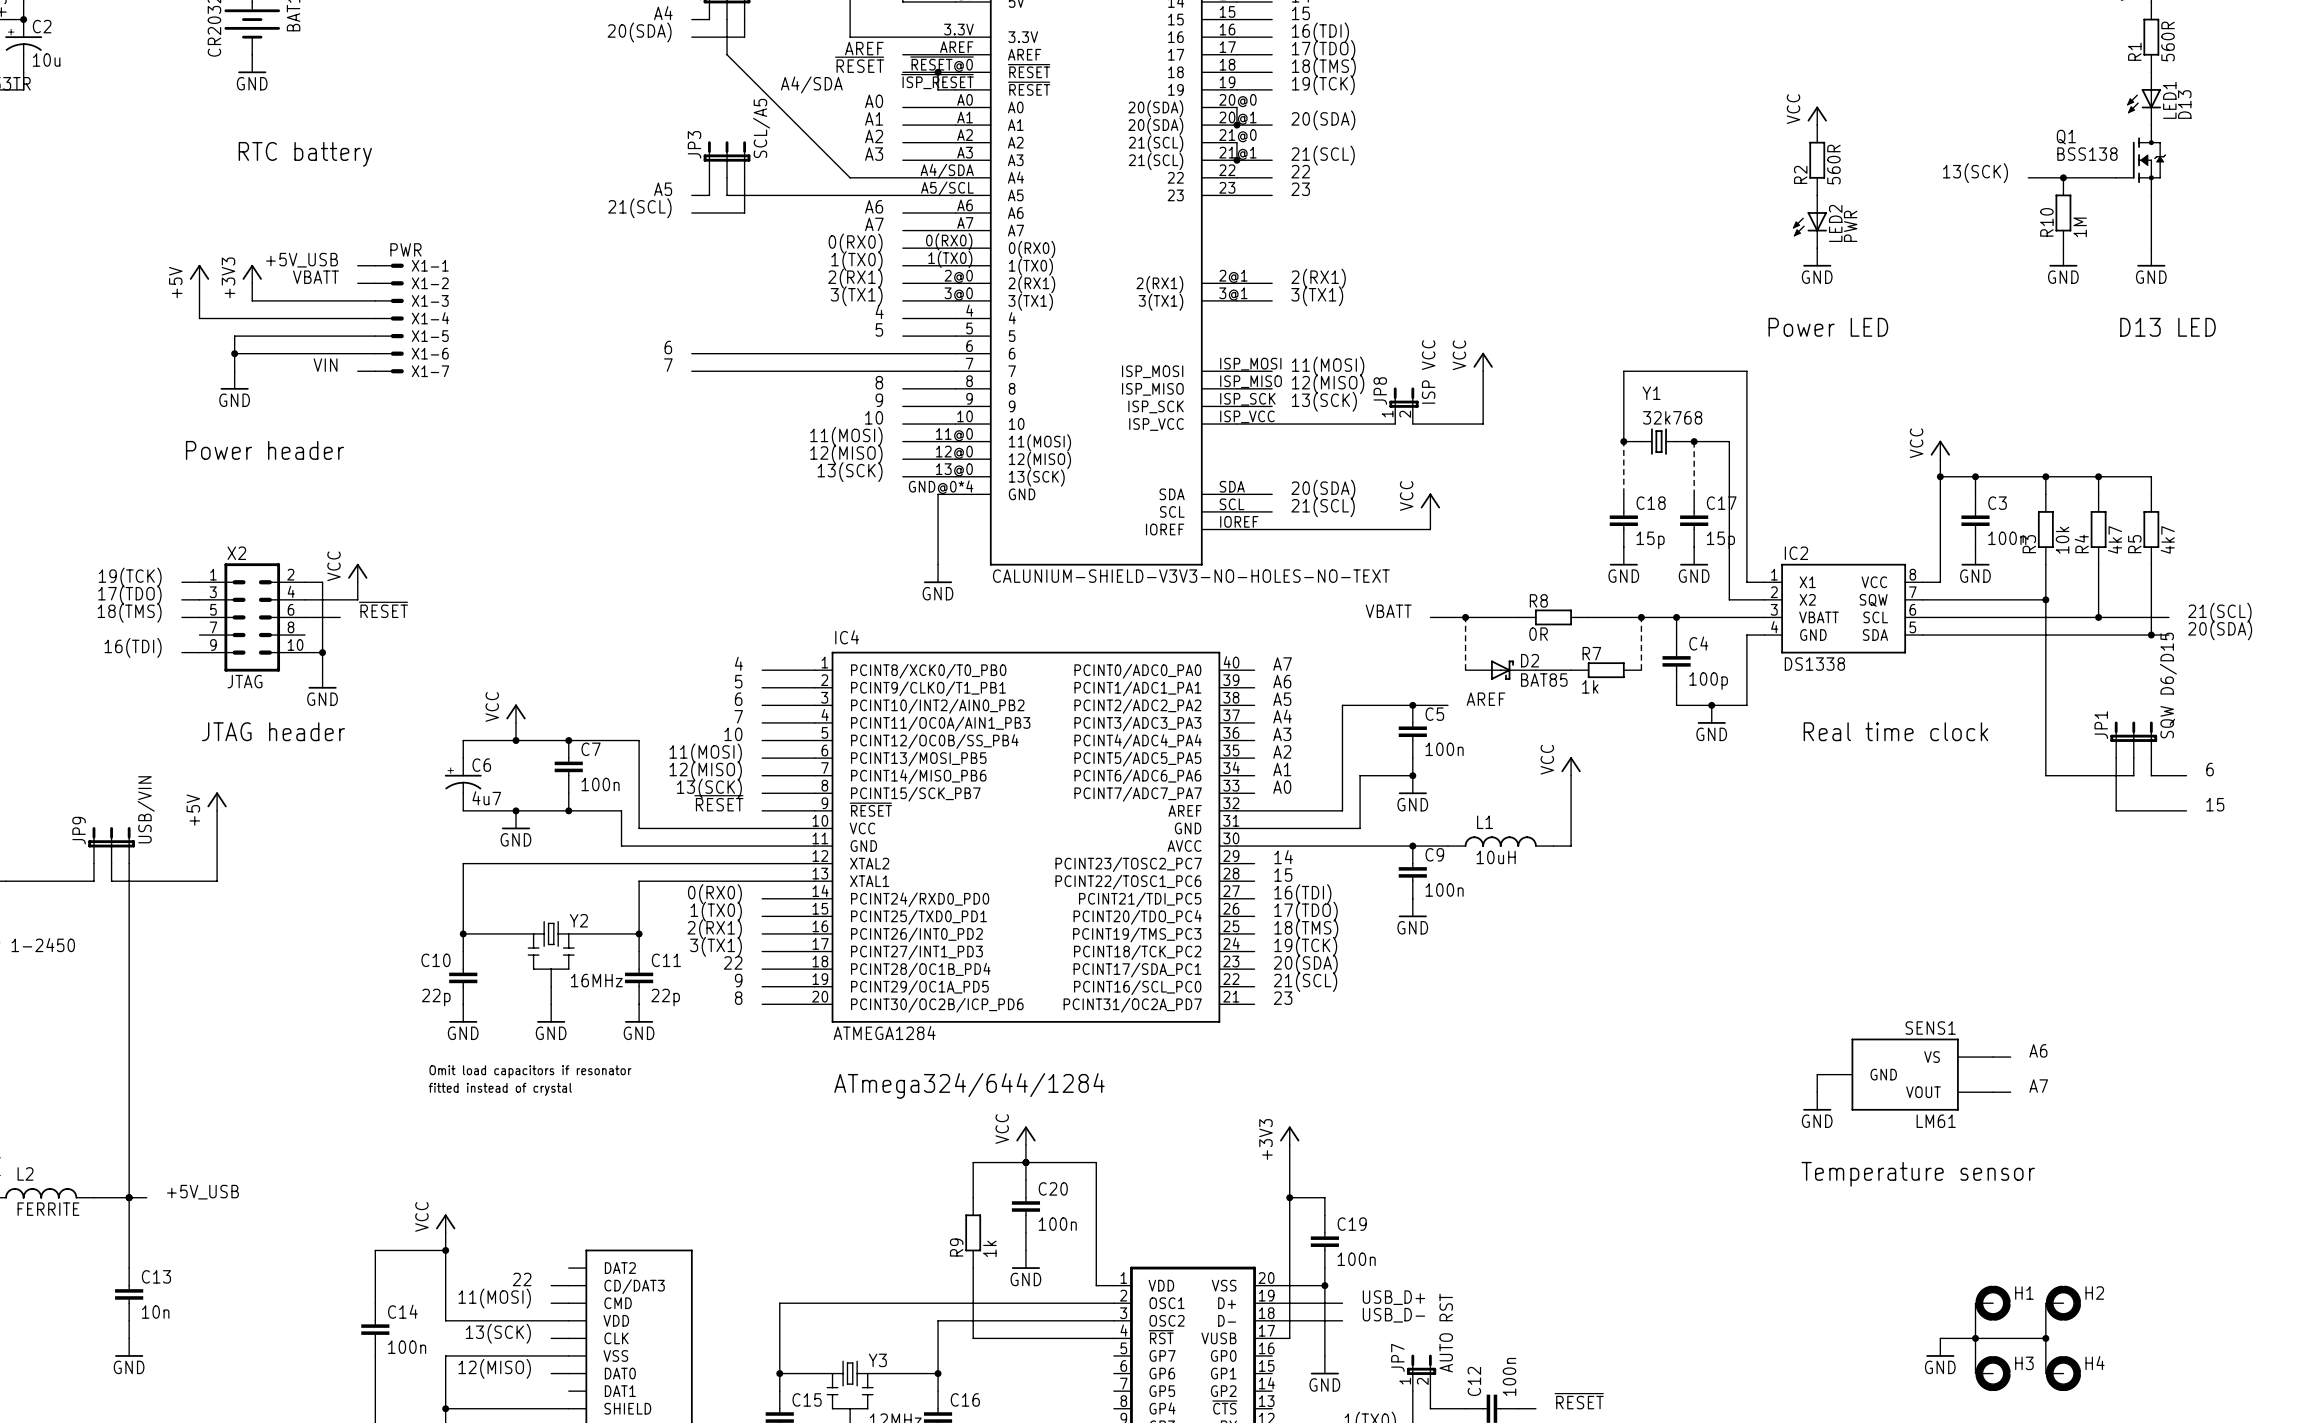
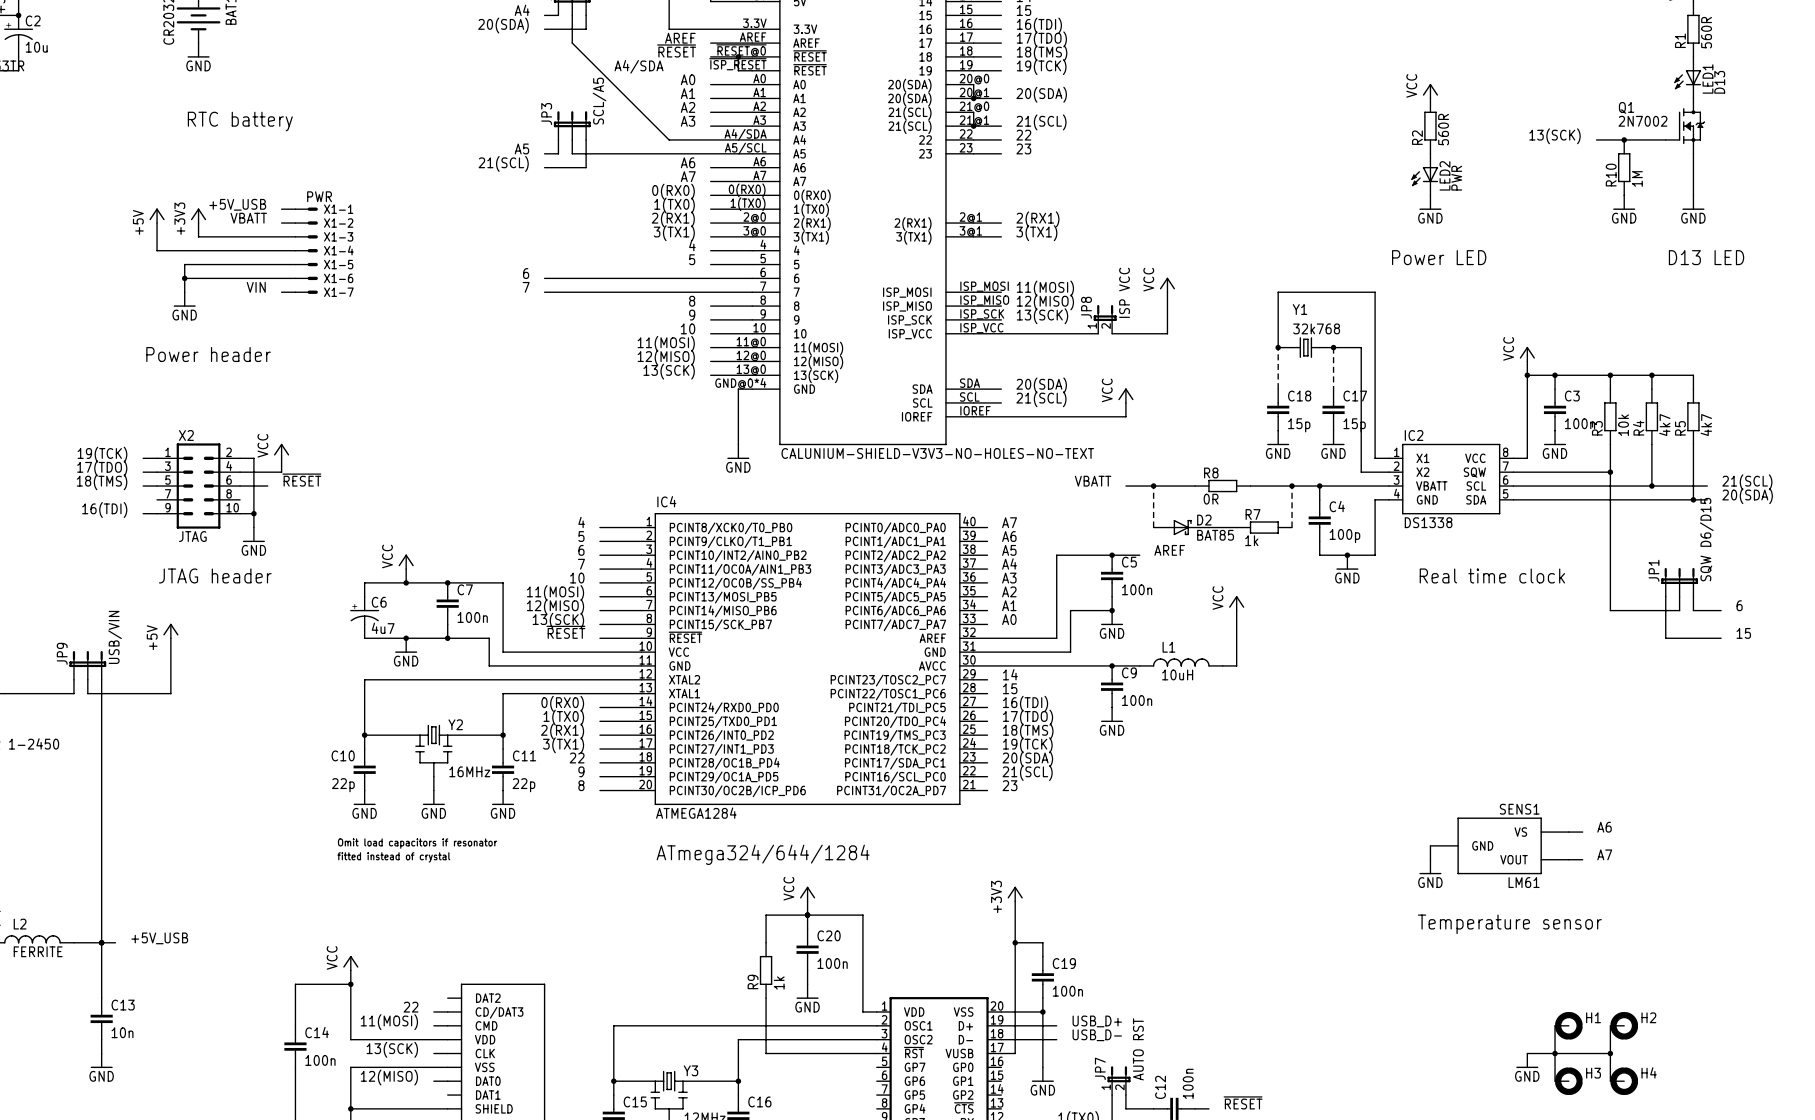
Q1 value: BSS138 (2087, 154) -> 2N7002 (1642, 121)

